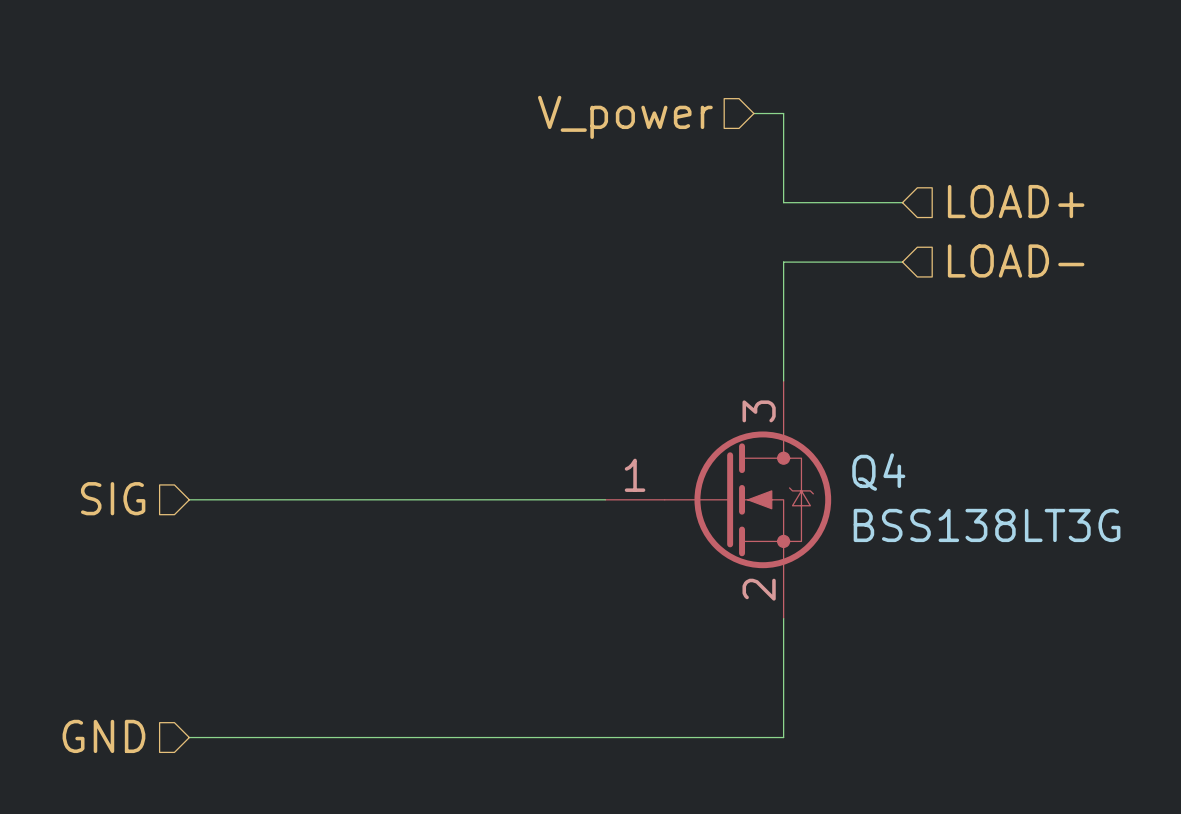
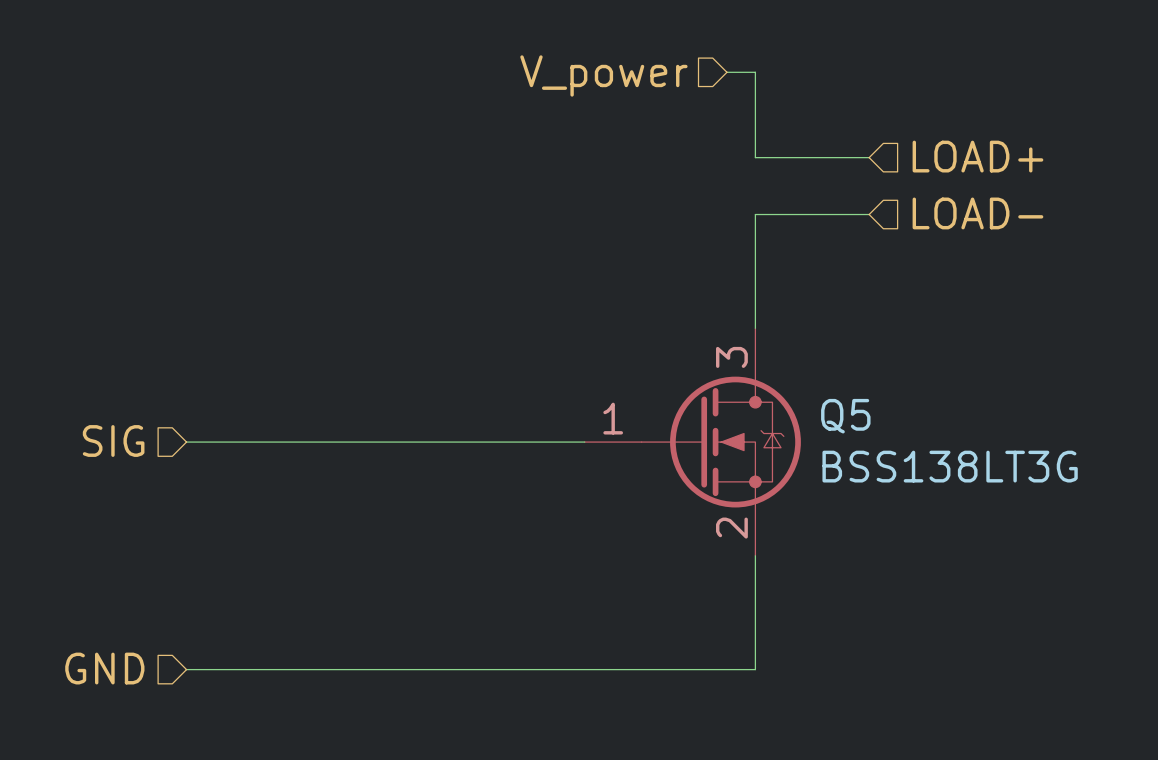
Q4 name: Q4 (878, 472) -> Q5 (845, 416)

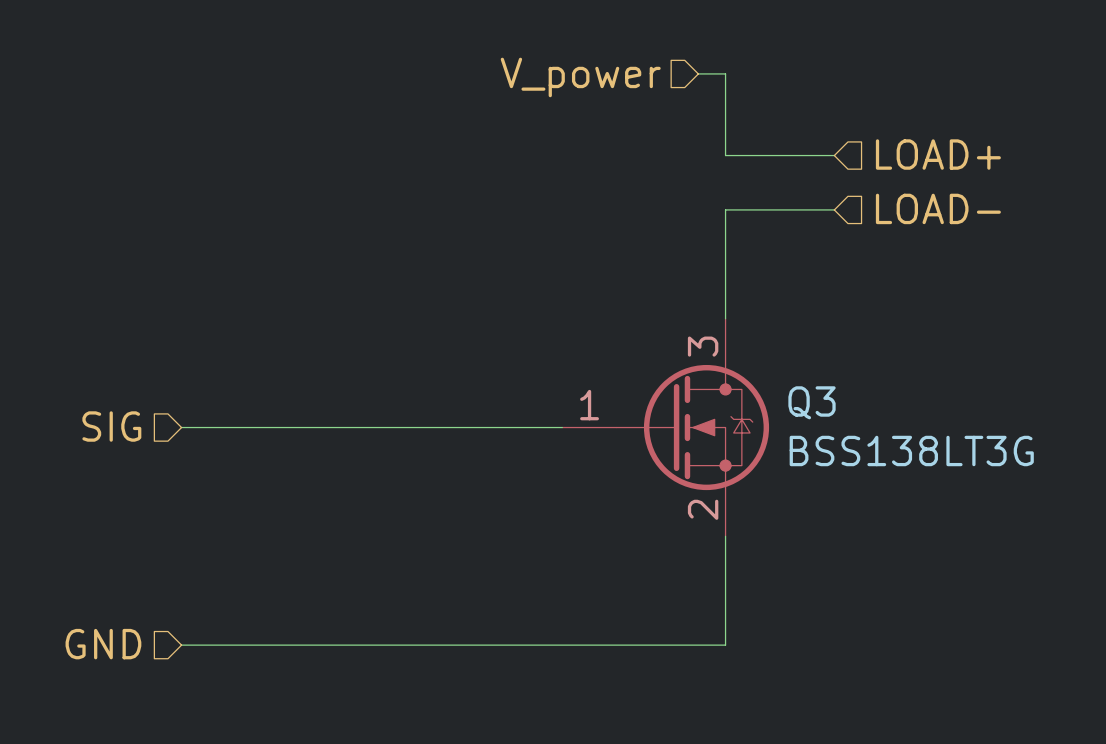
Q5 name: Q5 (845, 416) -> Q3 (812, 402)

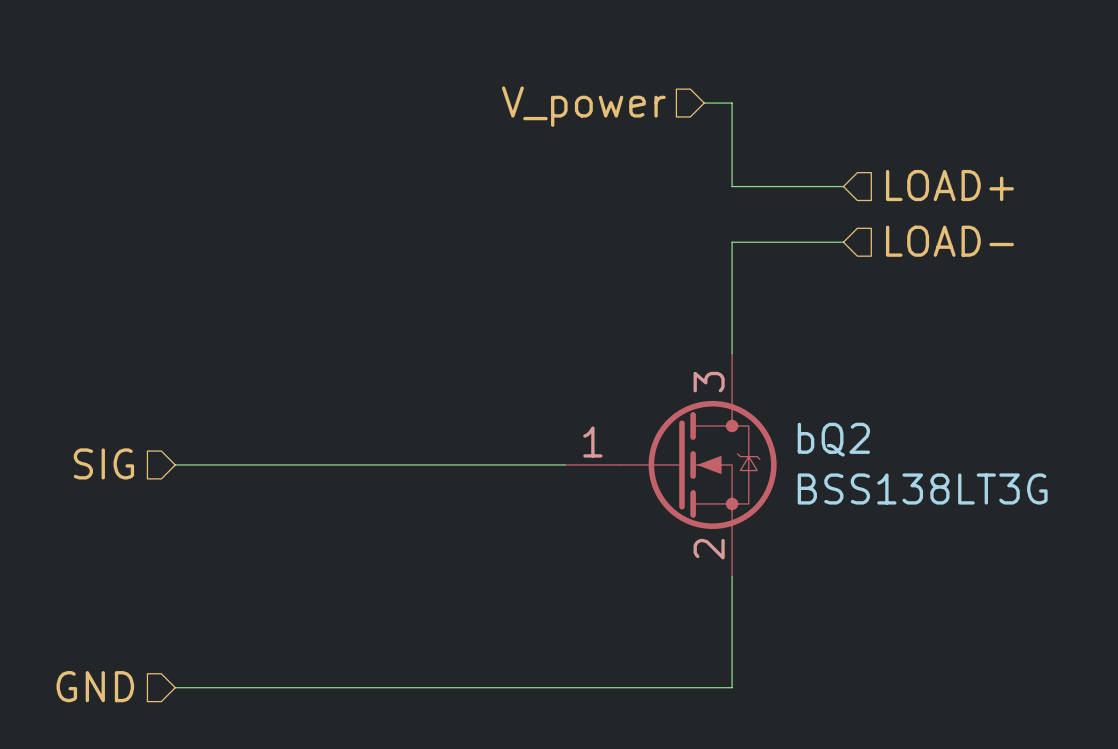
Q3 name: Q3 (812, 402) -> bQ2 (833, 439)

